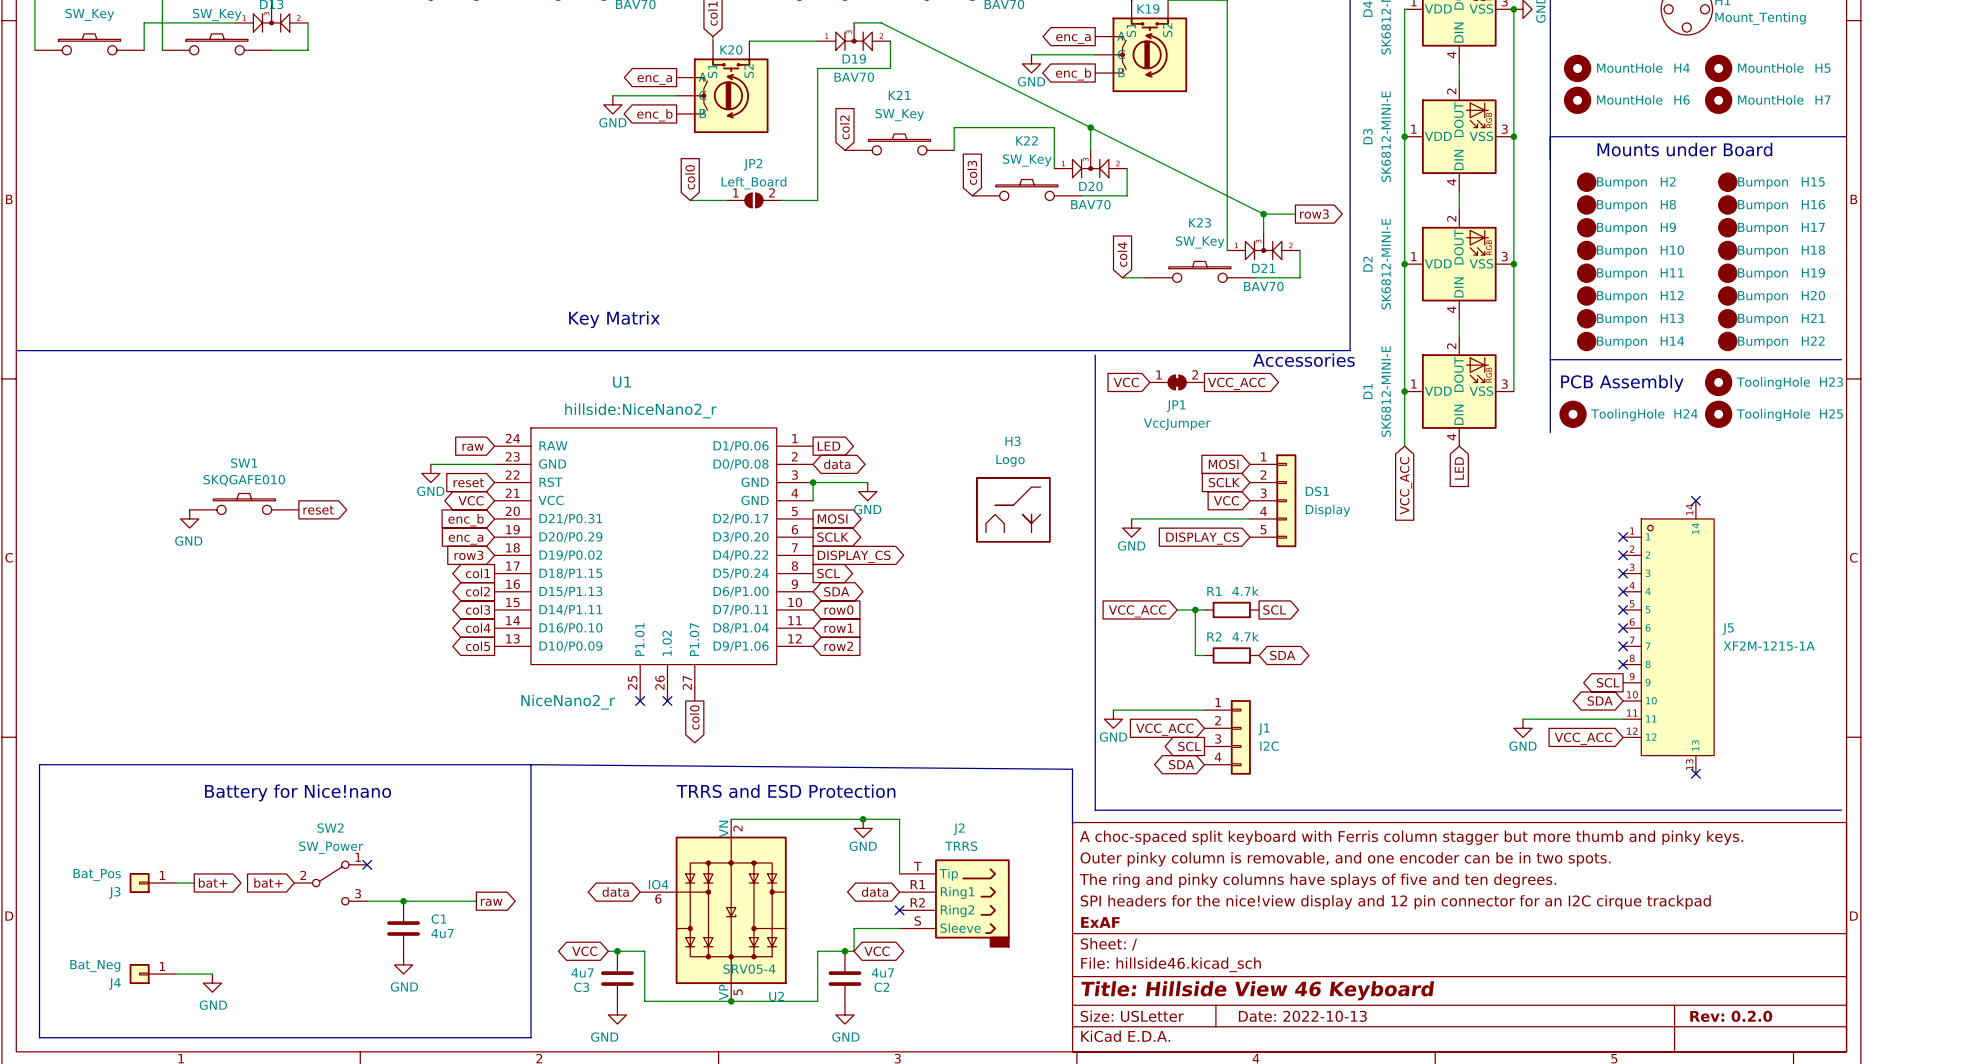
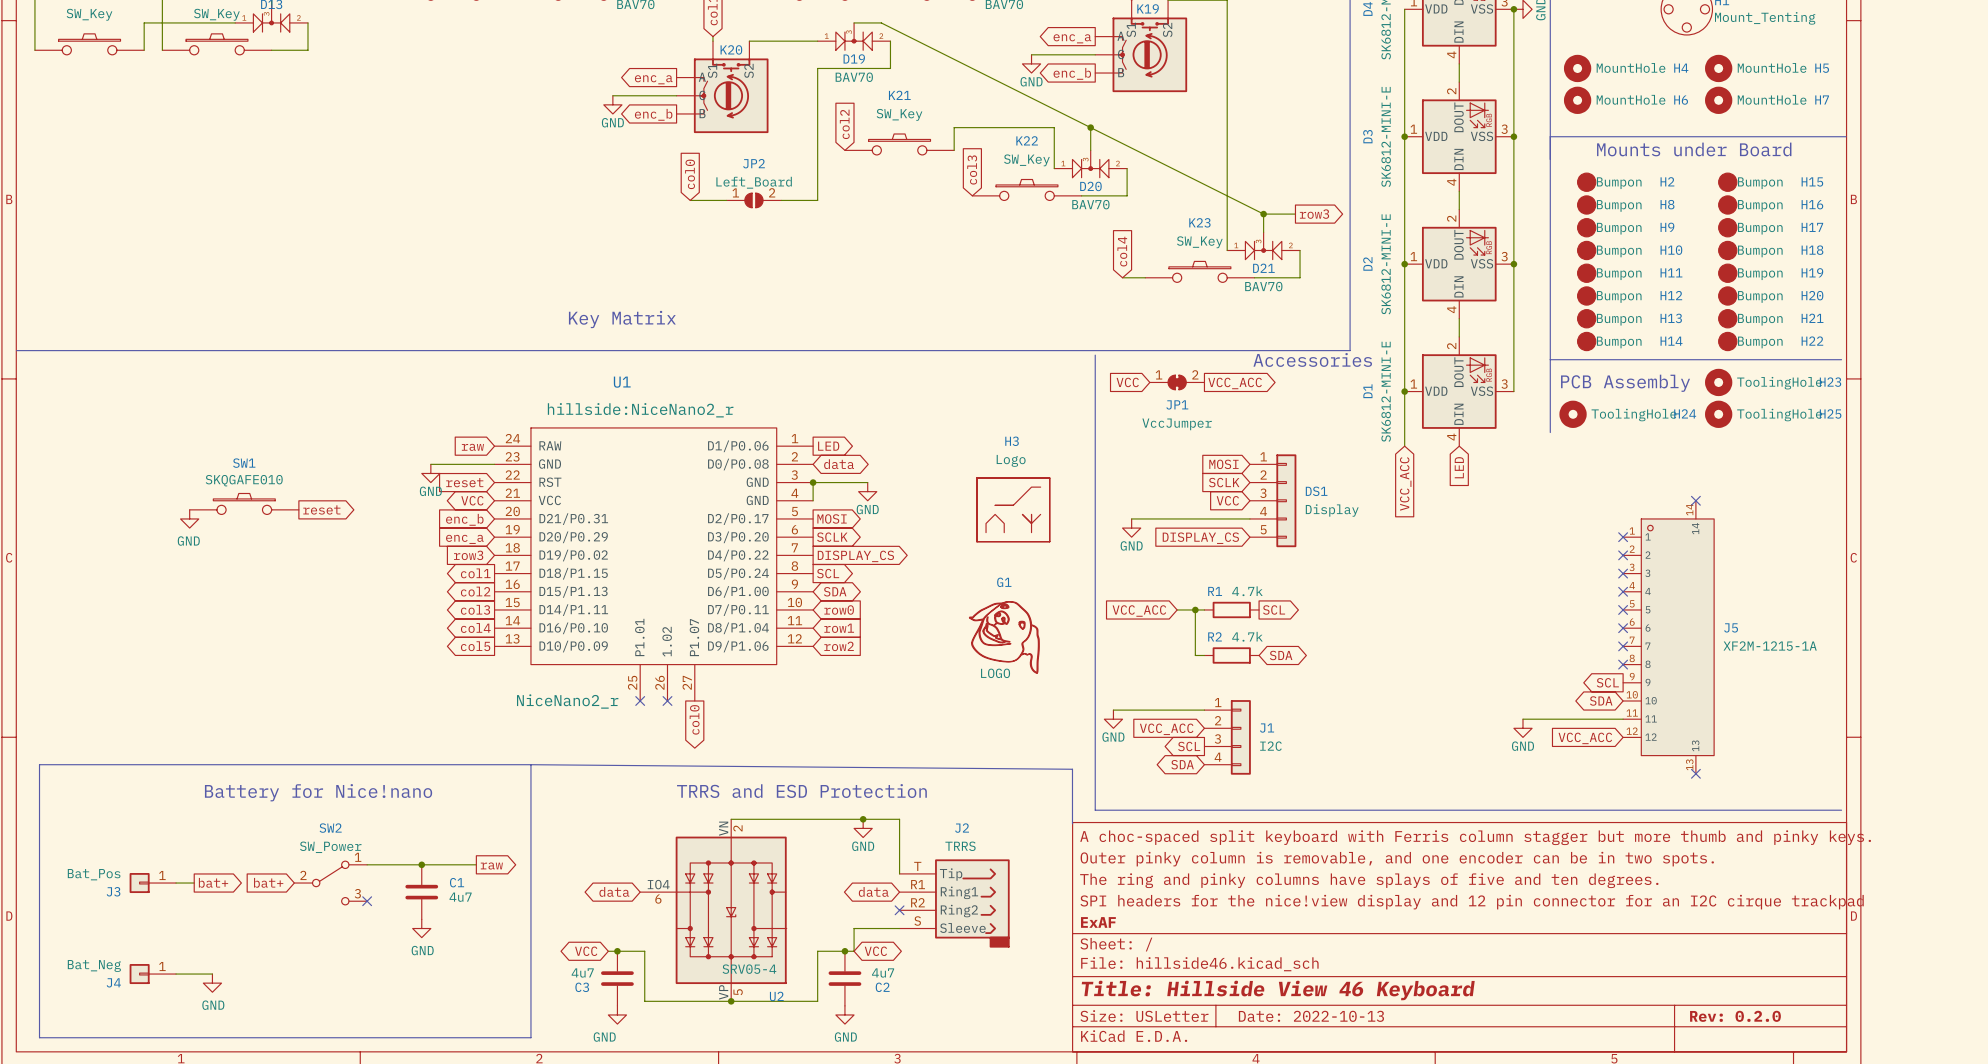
G1: none -> LOGO (1004, 637)
no-connect mark position: (367, 864) -> (367, 901)
wire: (367, 901) (476, 901) -> (367, 864) (476, 864)
junction position: (403, 901) -> (421, 864)
global label position: raw (491, 902) -> raw (491, 866)
C1 position: (403, 928) -> (421, 892)
power symbol position: GND (403, 964) -> GND (421, 928)

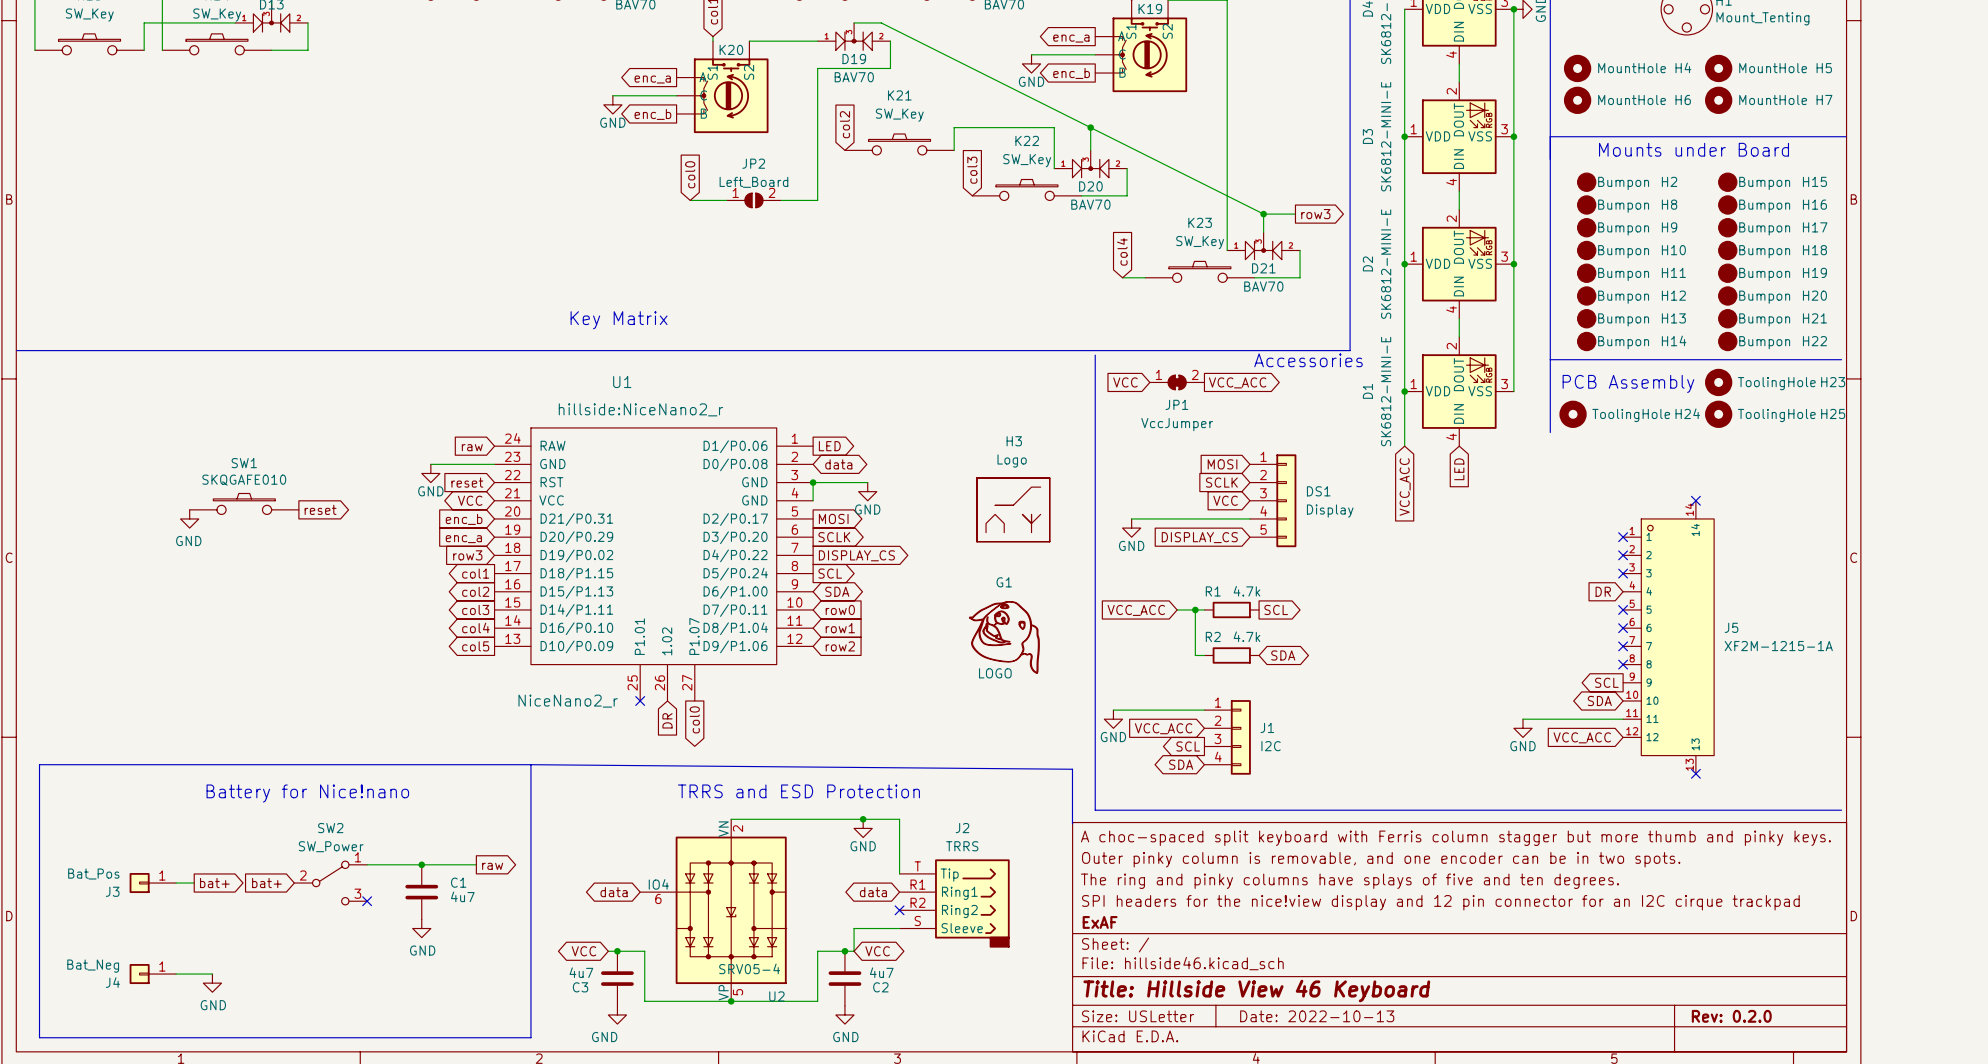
global label: none -> DR (1603, 591)
no-connect mark: (1623, 591) -> none
no-connect mark: (667, 700) -> none
global label: none -> DR (667, 720)

